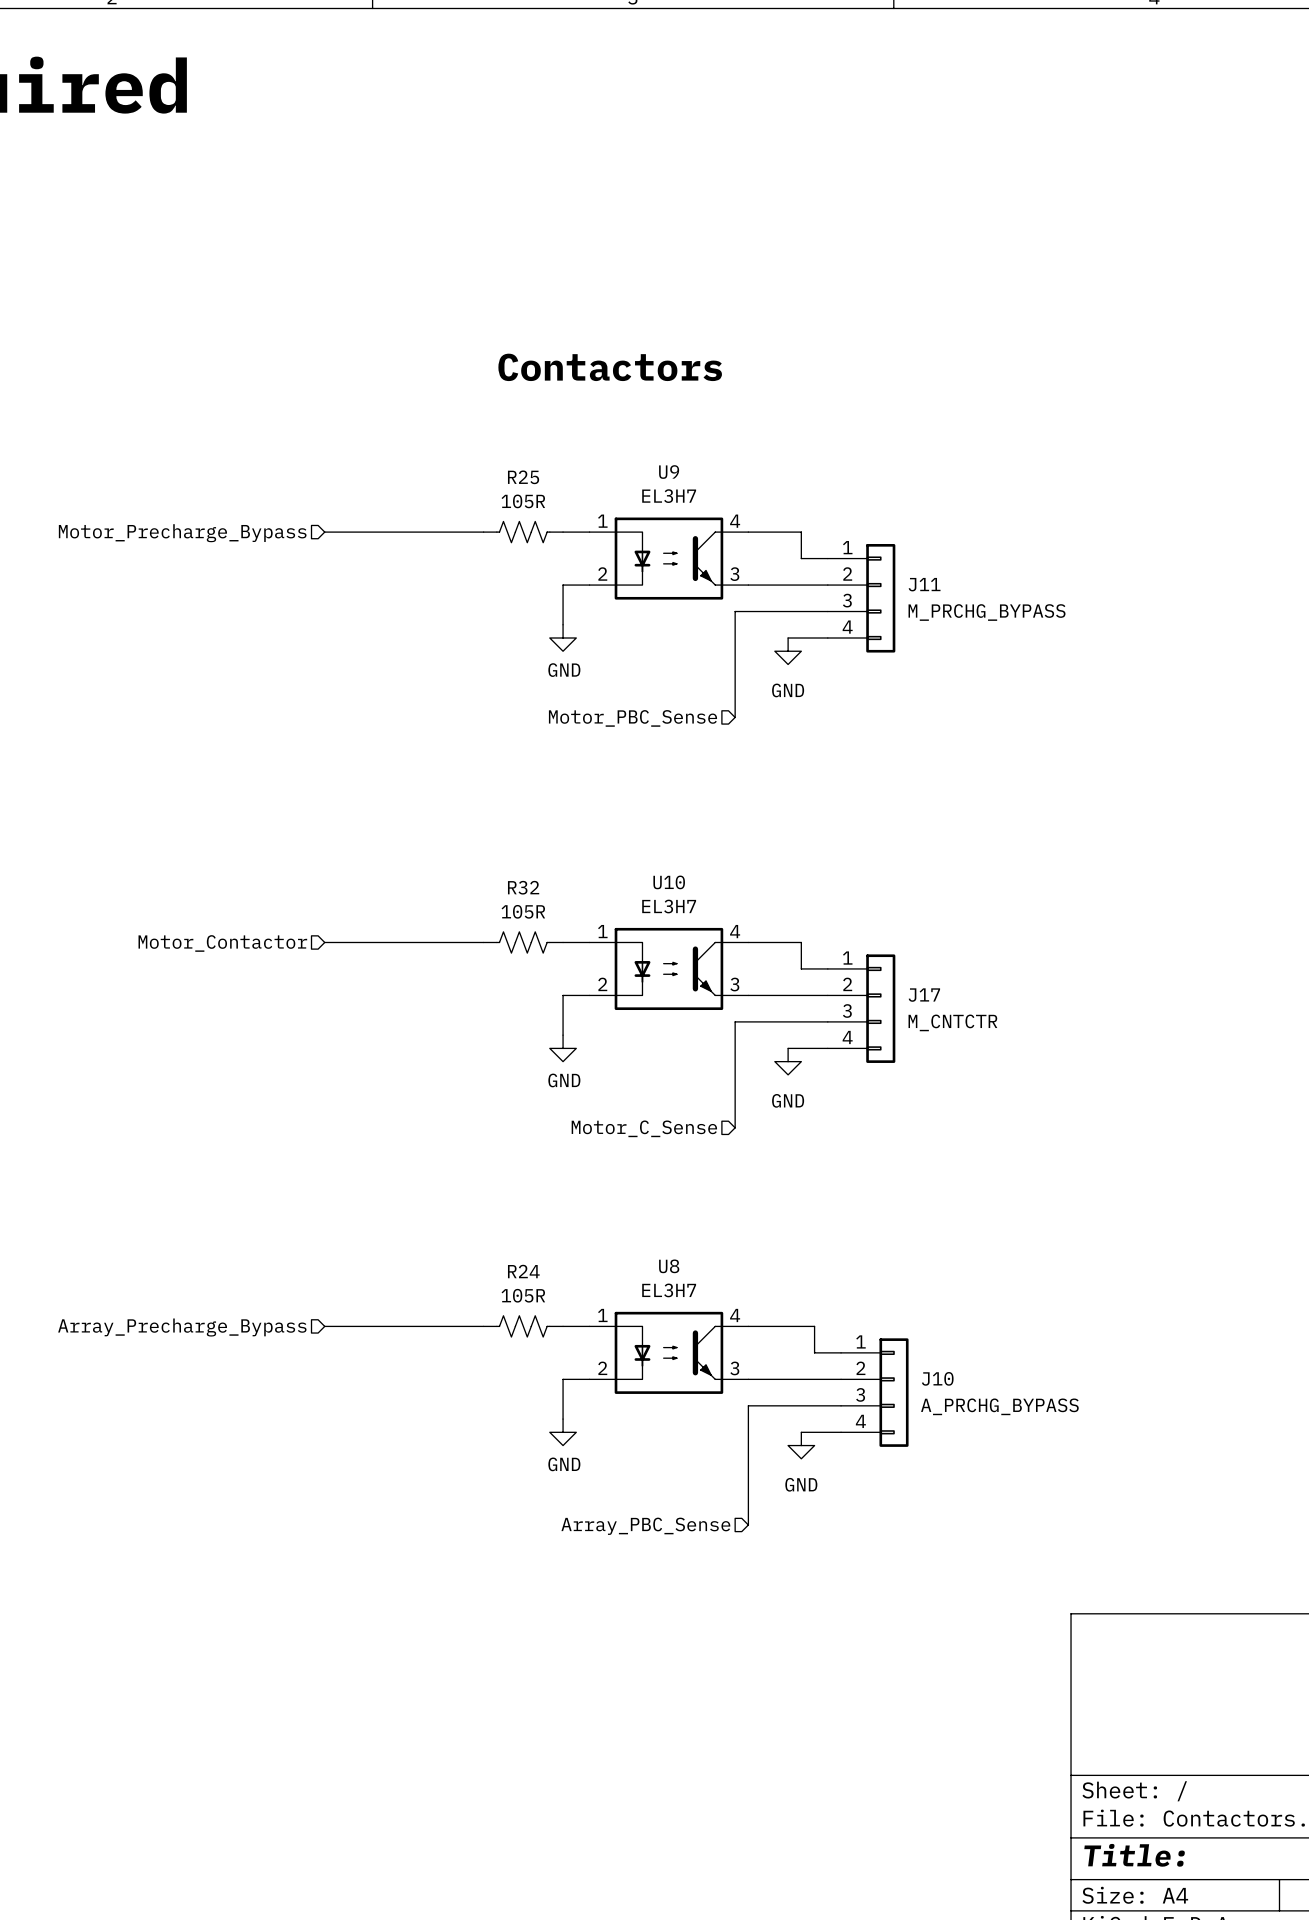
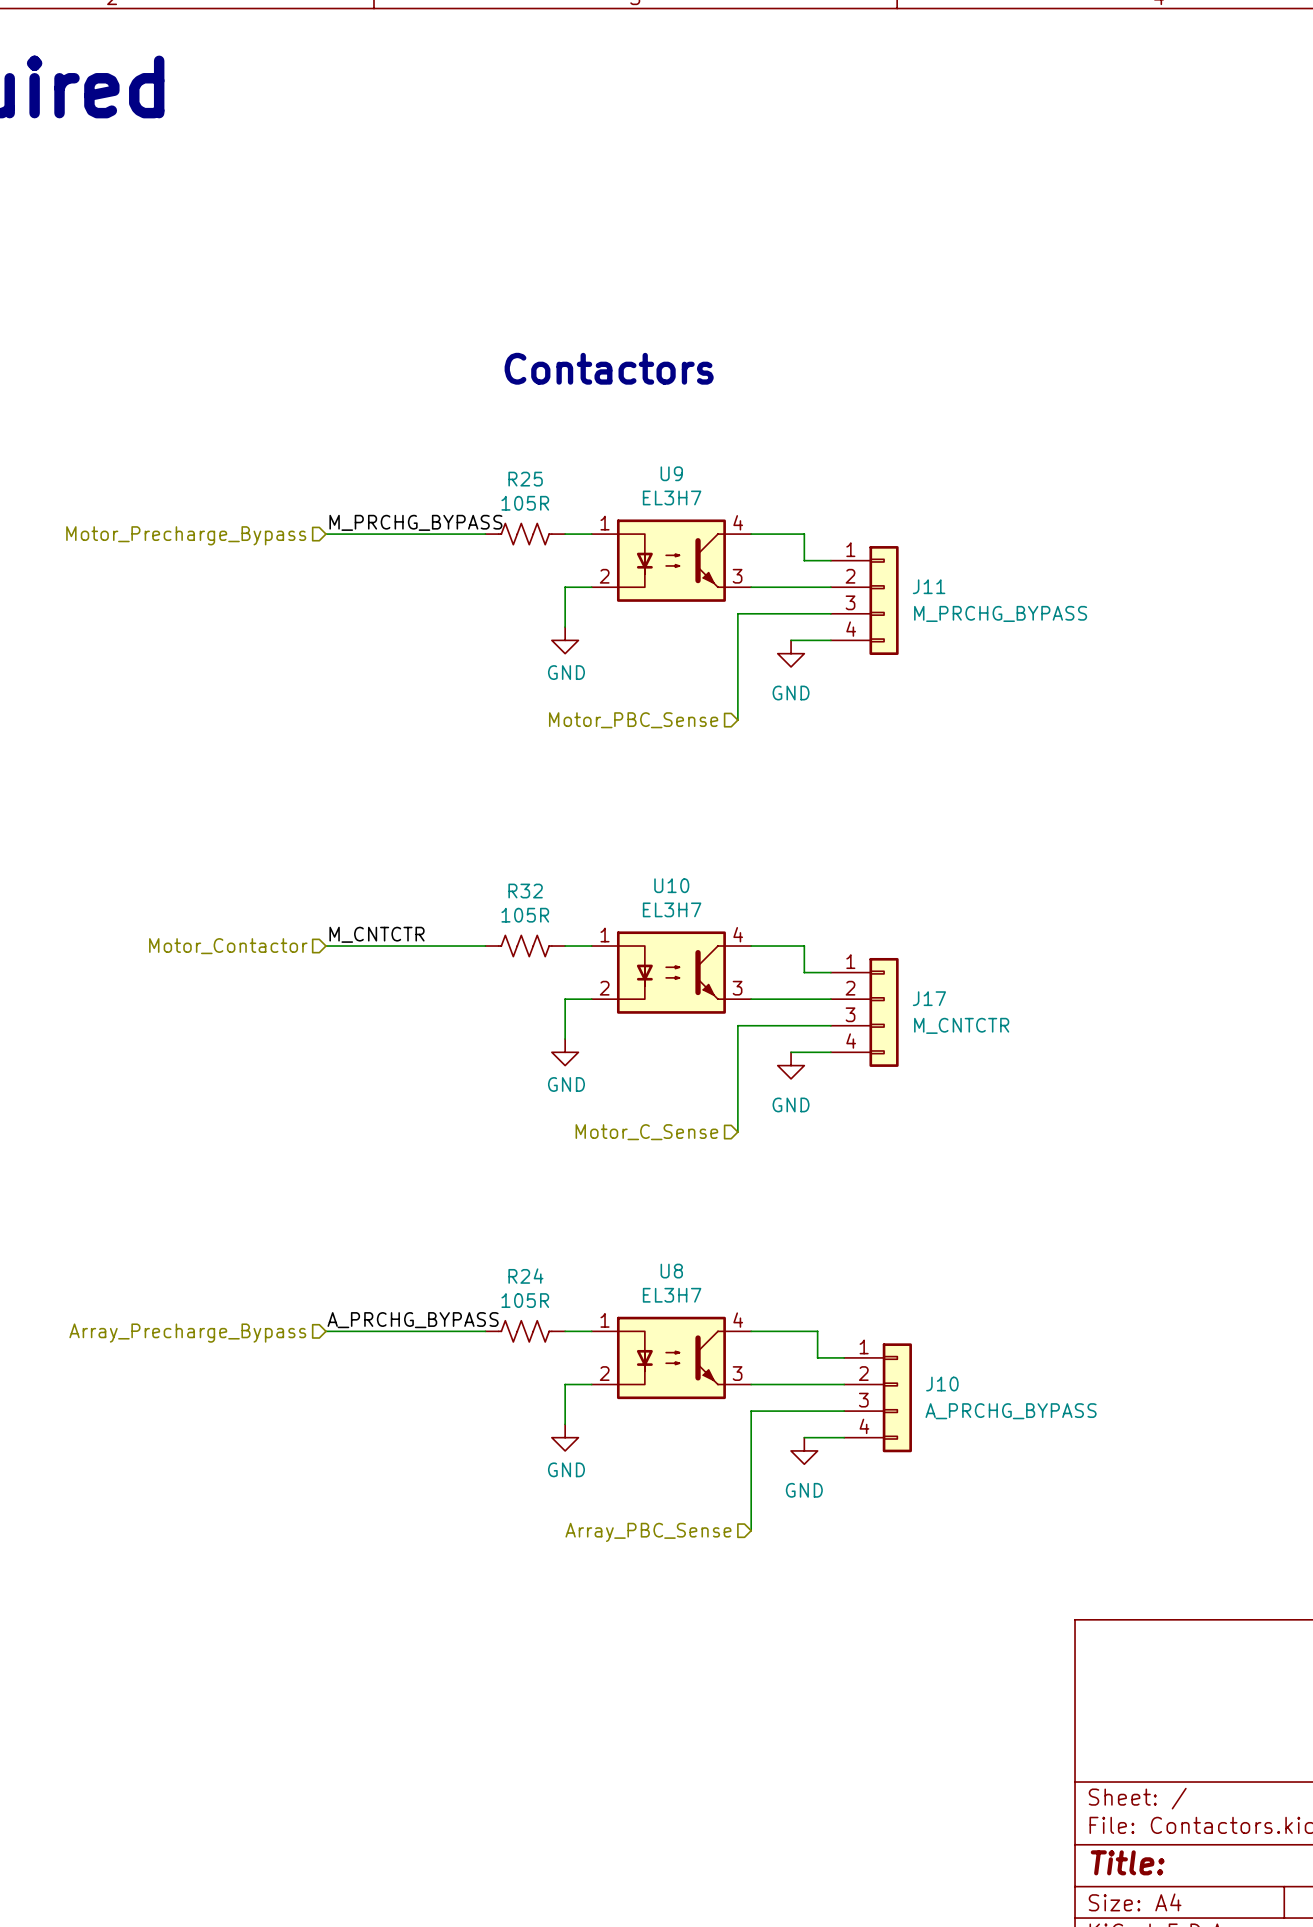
label: none -> M_PRCHG_BYPASS (415, 522)
label: none -> M_CNTCTR (377, 934)
label: none -> A_PRCHG_BYPASS (413, 1320)

